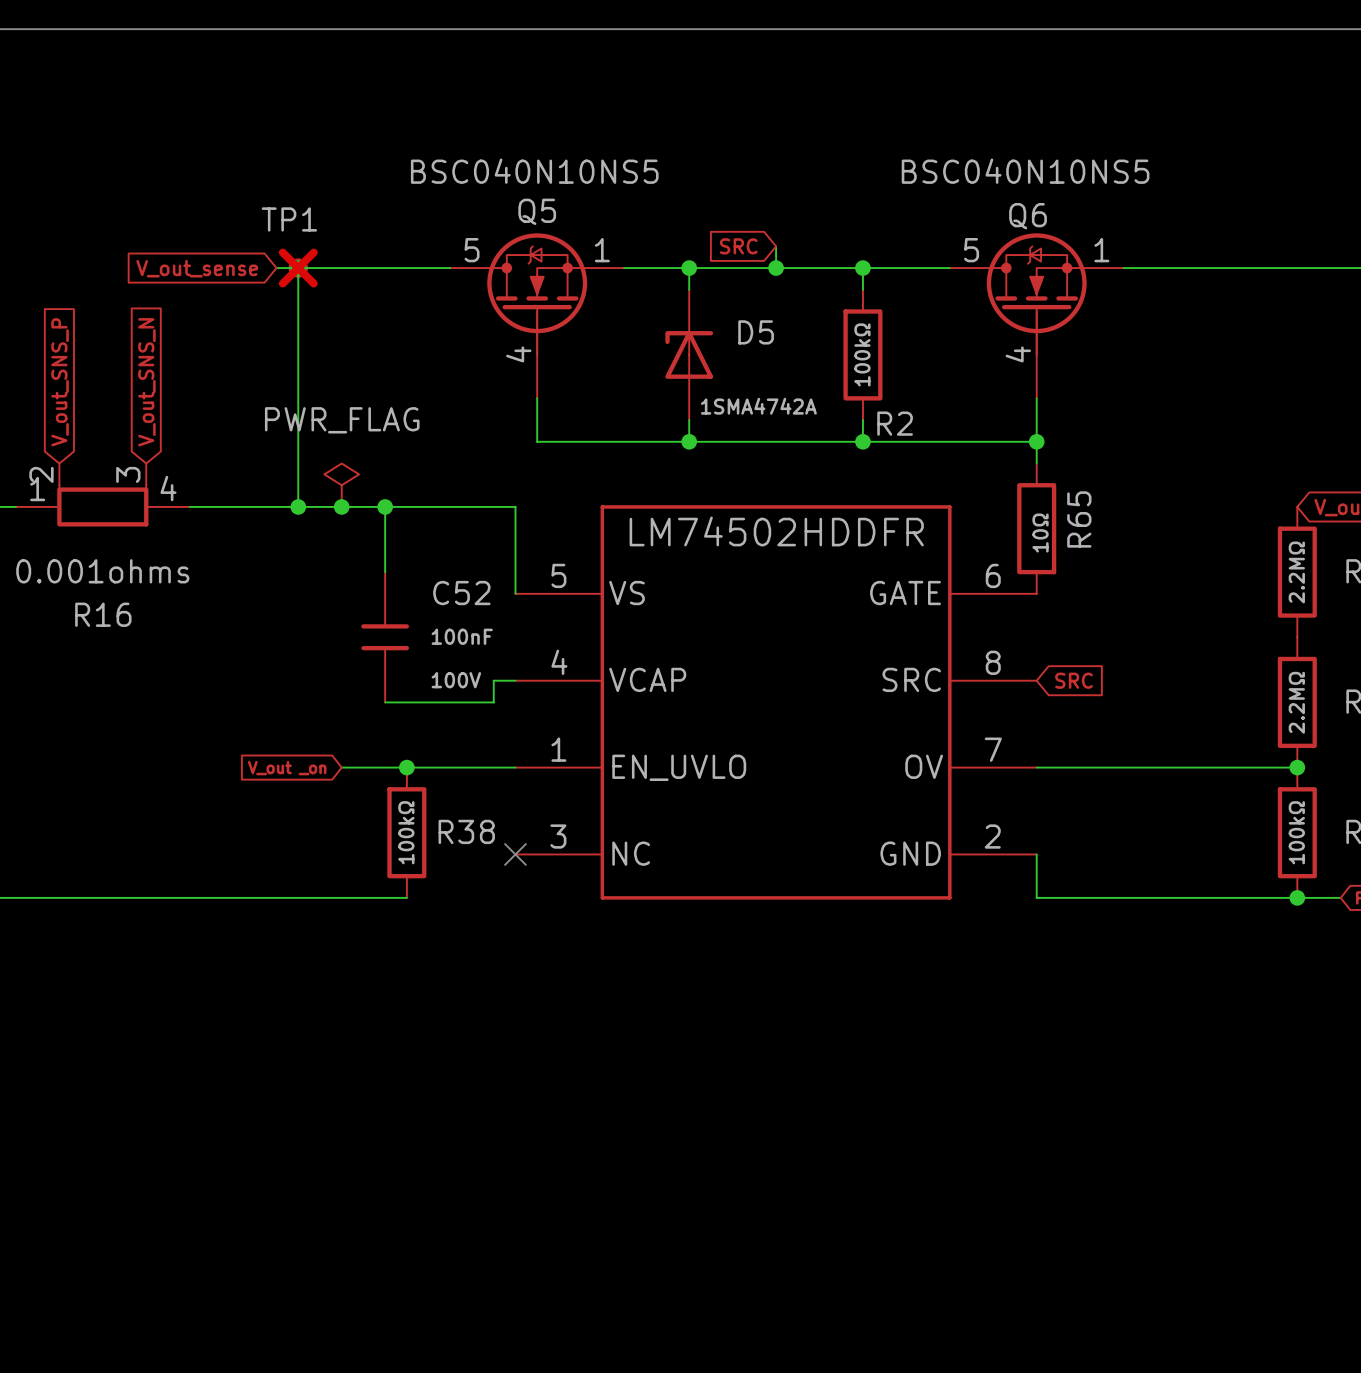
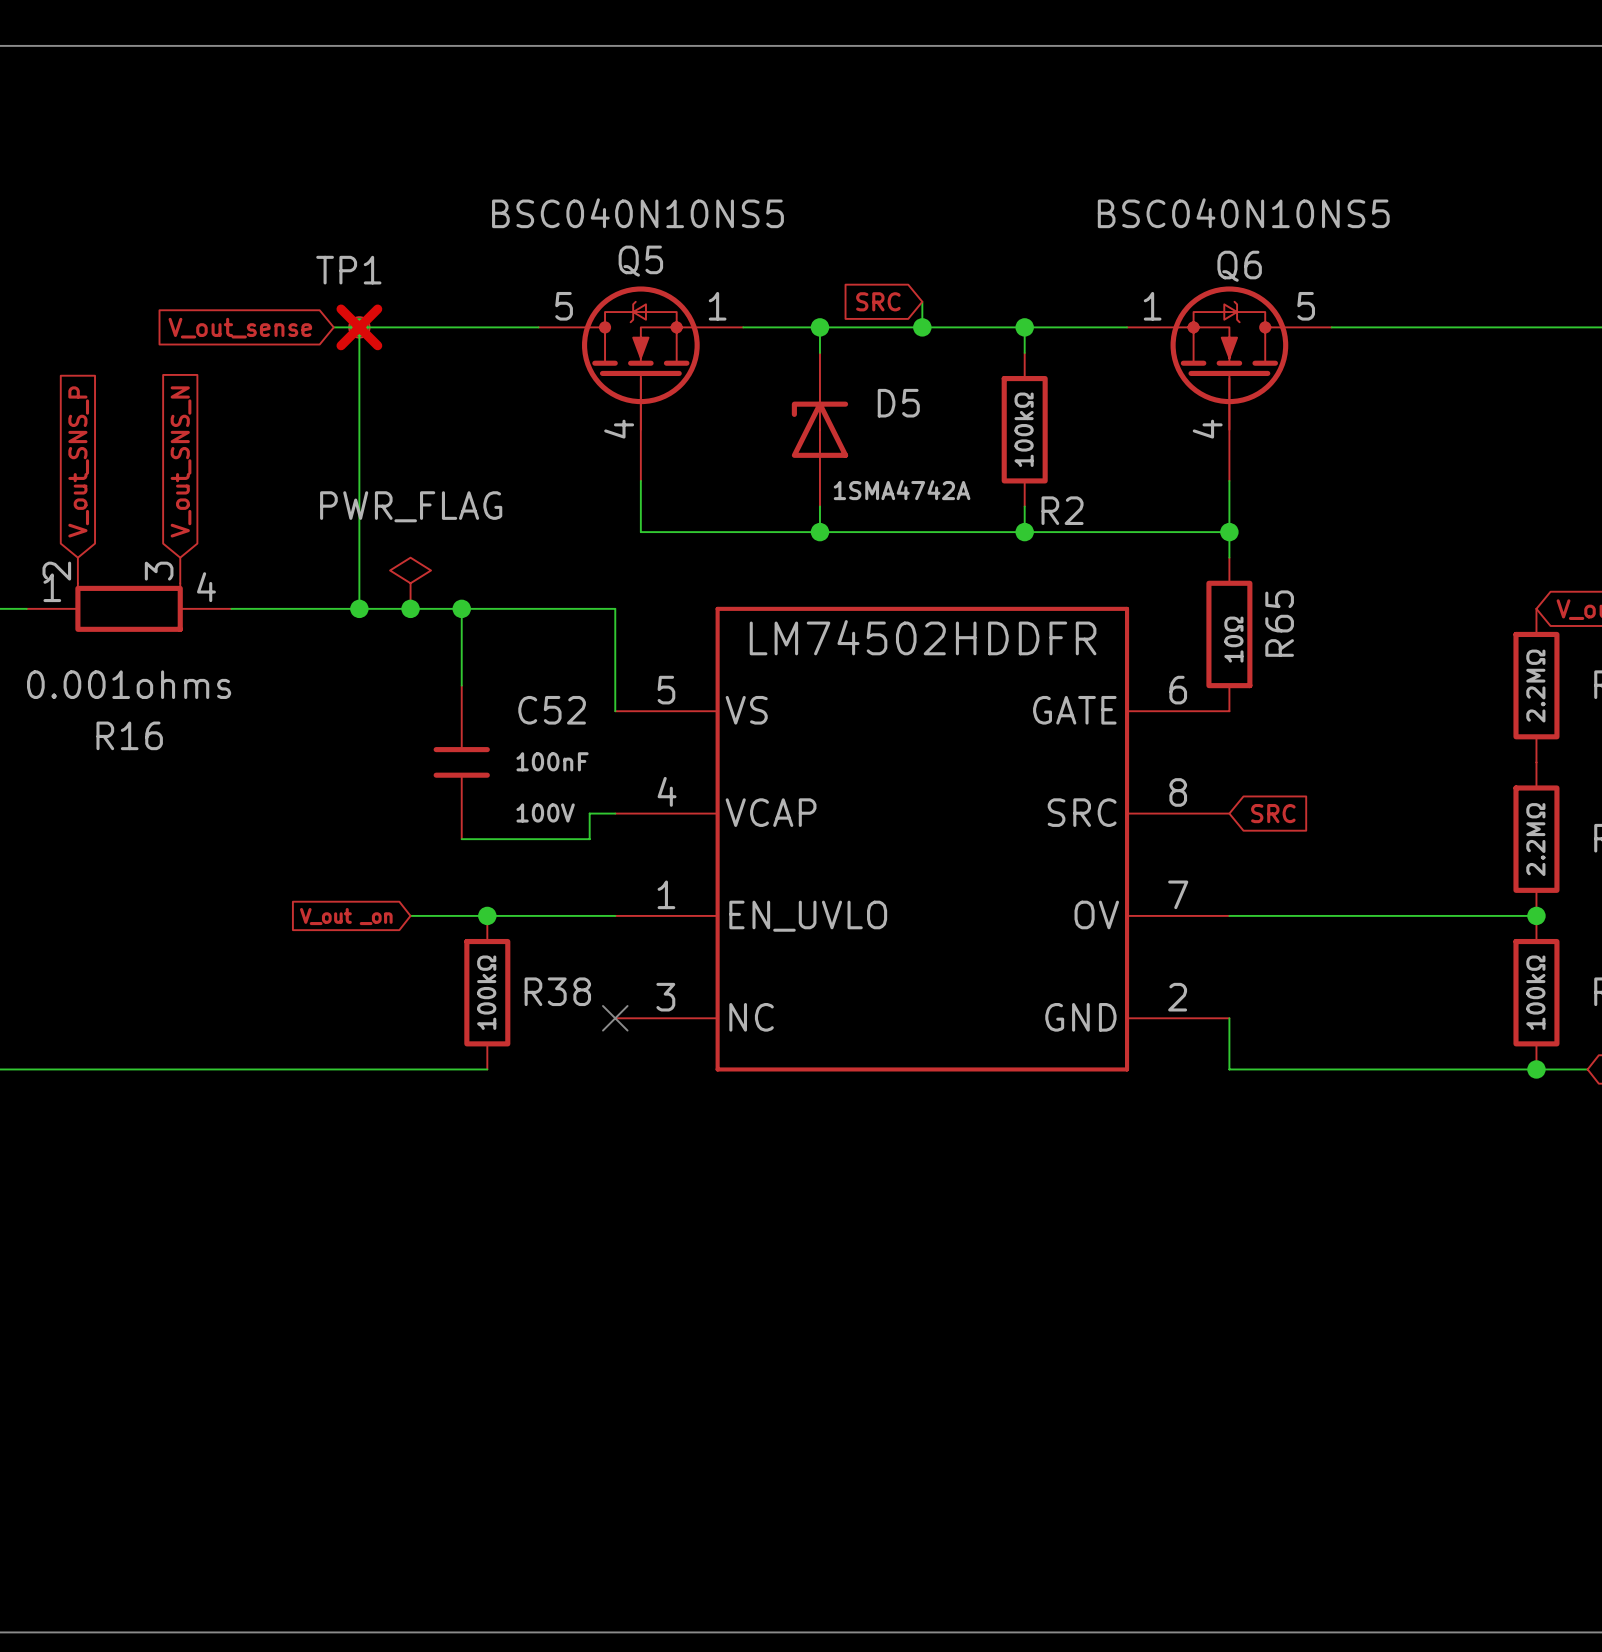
Q6 flip: as is (1036, 294) -> left-right (1229, 358)

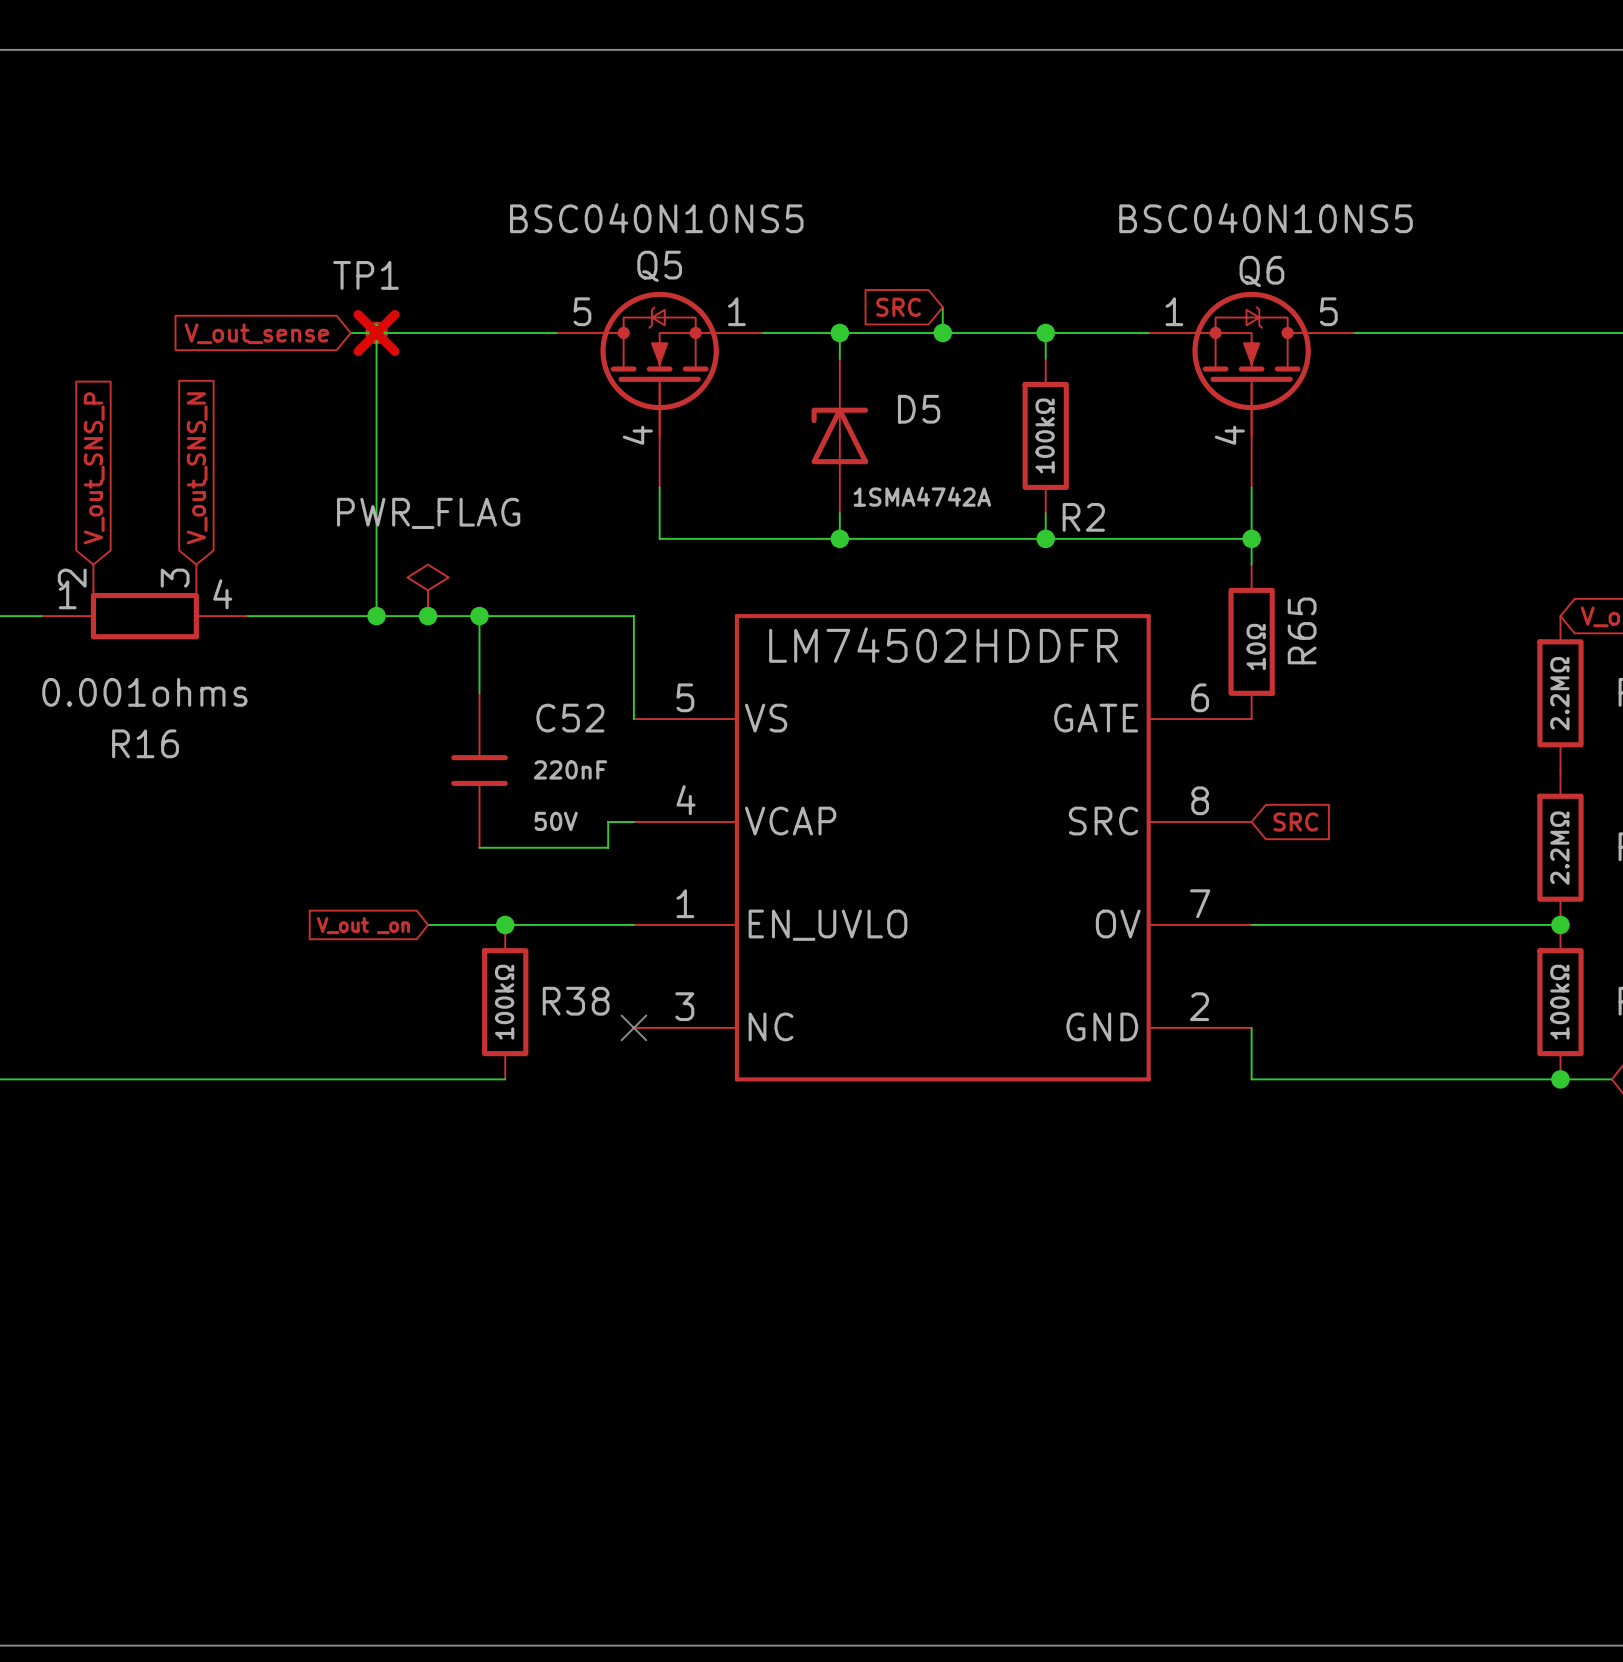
C52 value: 100nF (552, 761) -> 220nF (570, 769)
C52 text: 100V (545, 812) -> 50V (556, 821)

